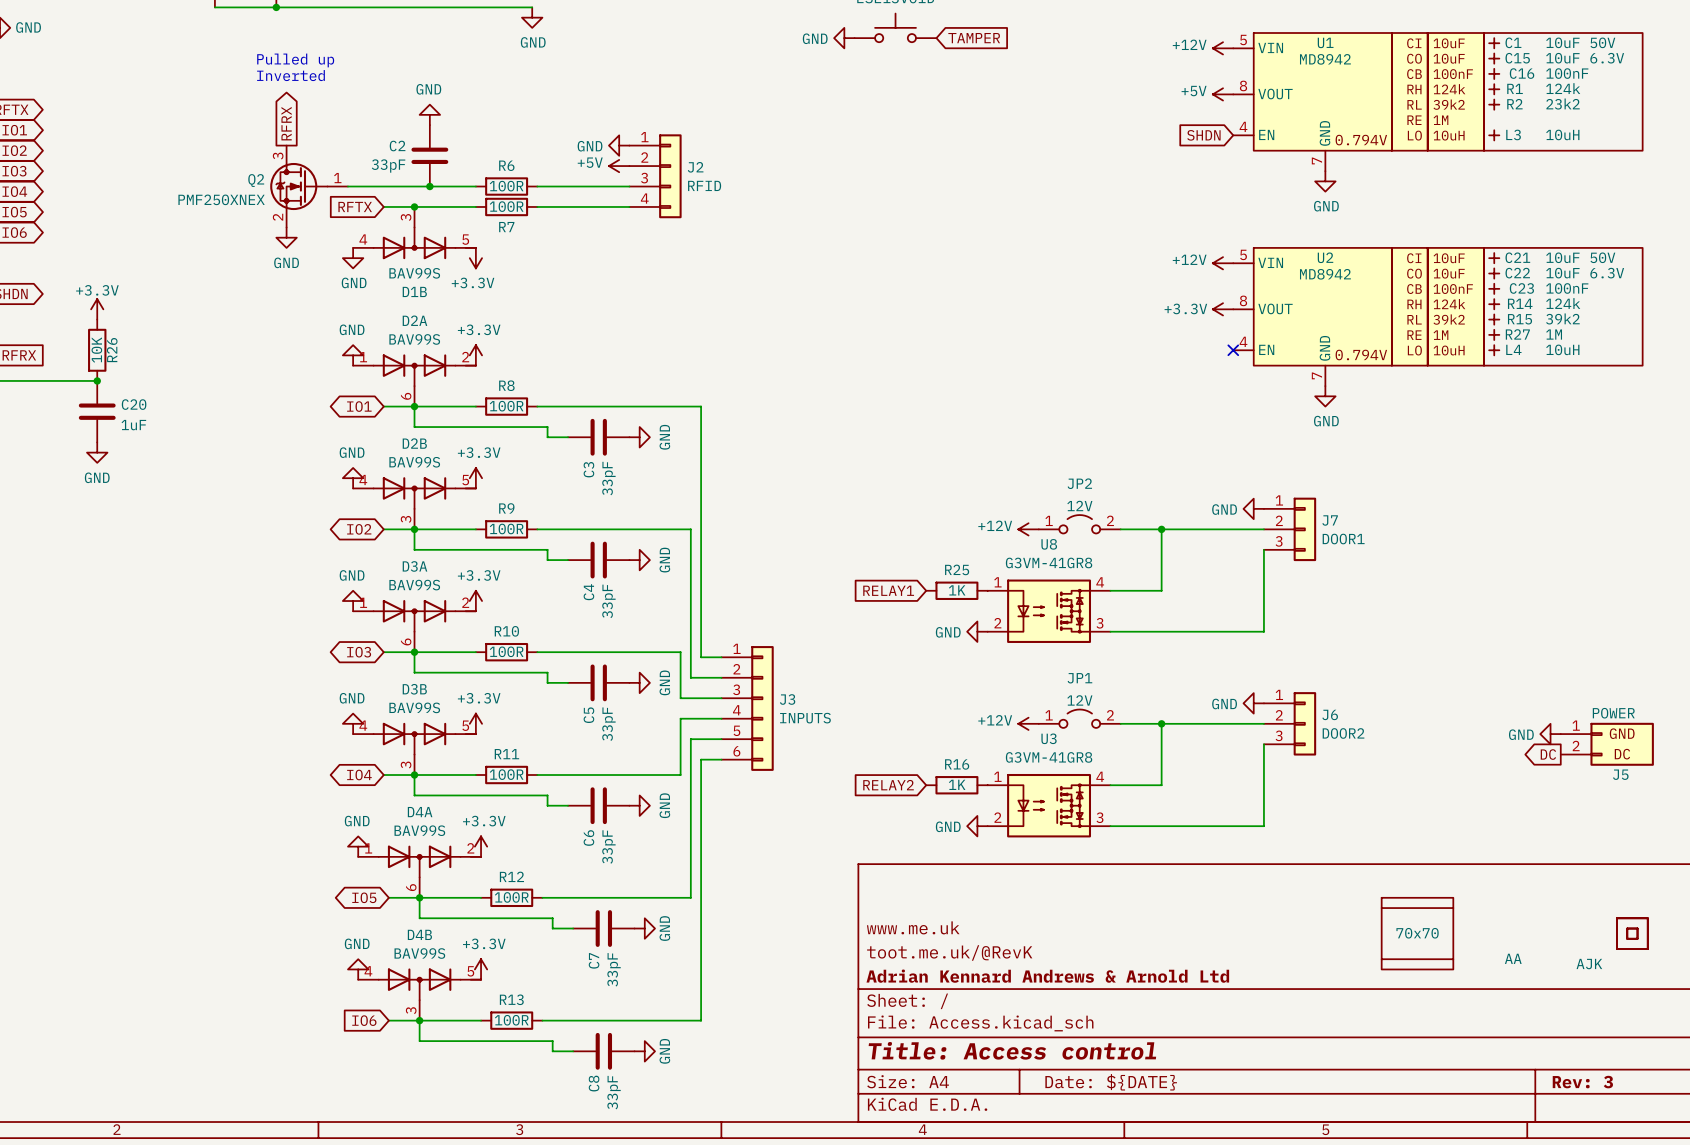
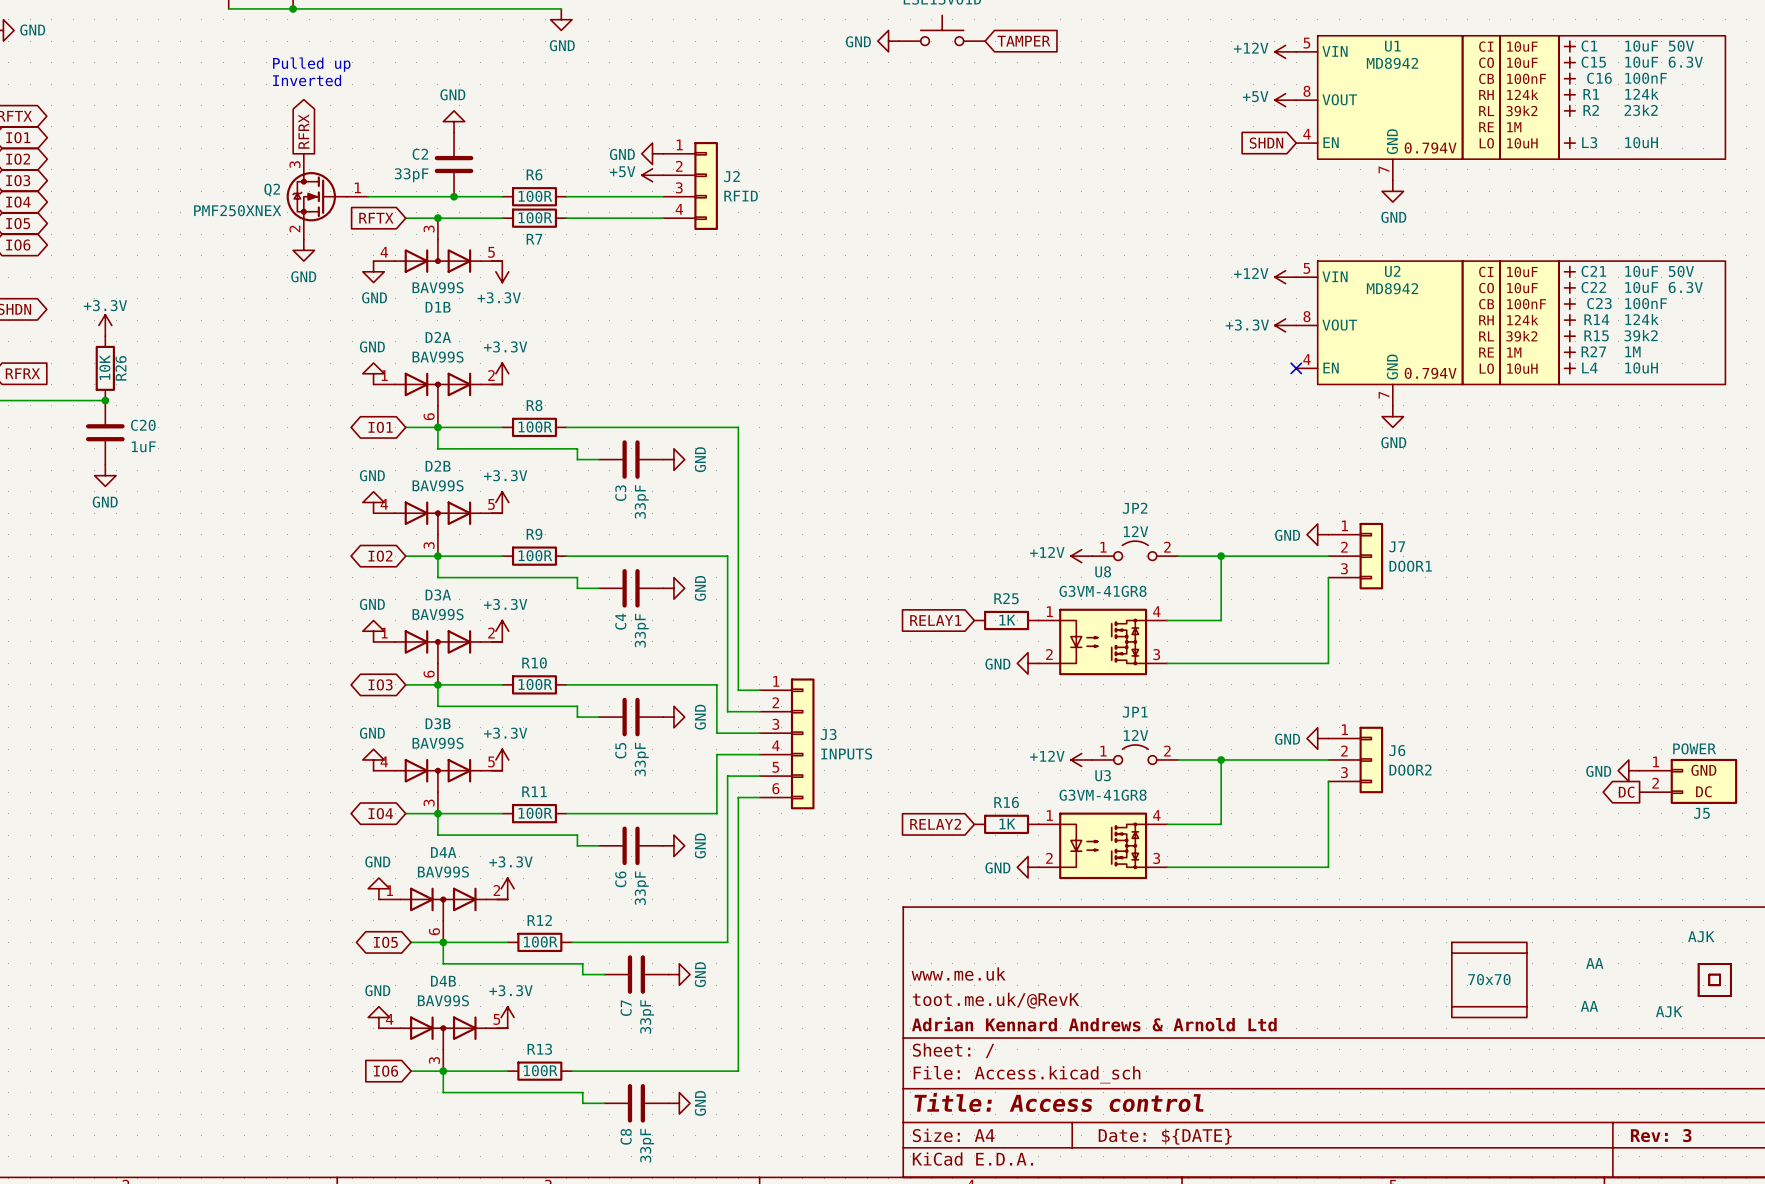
part: none -> AJK (1701, 936)
part: none -> AA (1594, 963)

